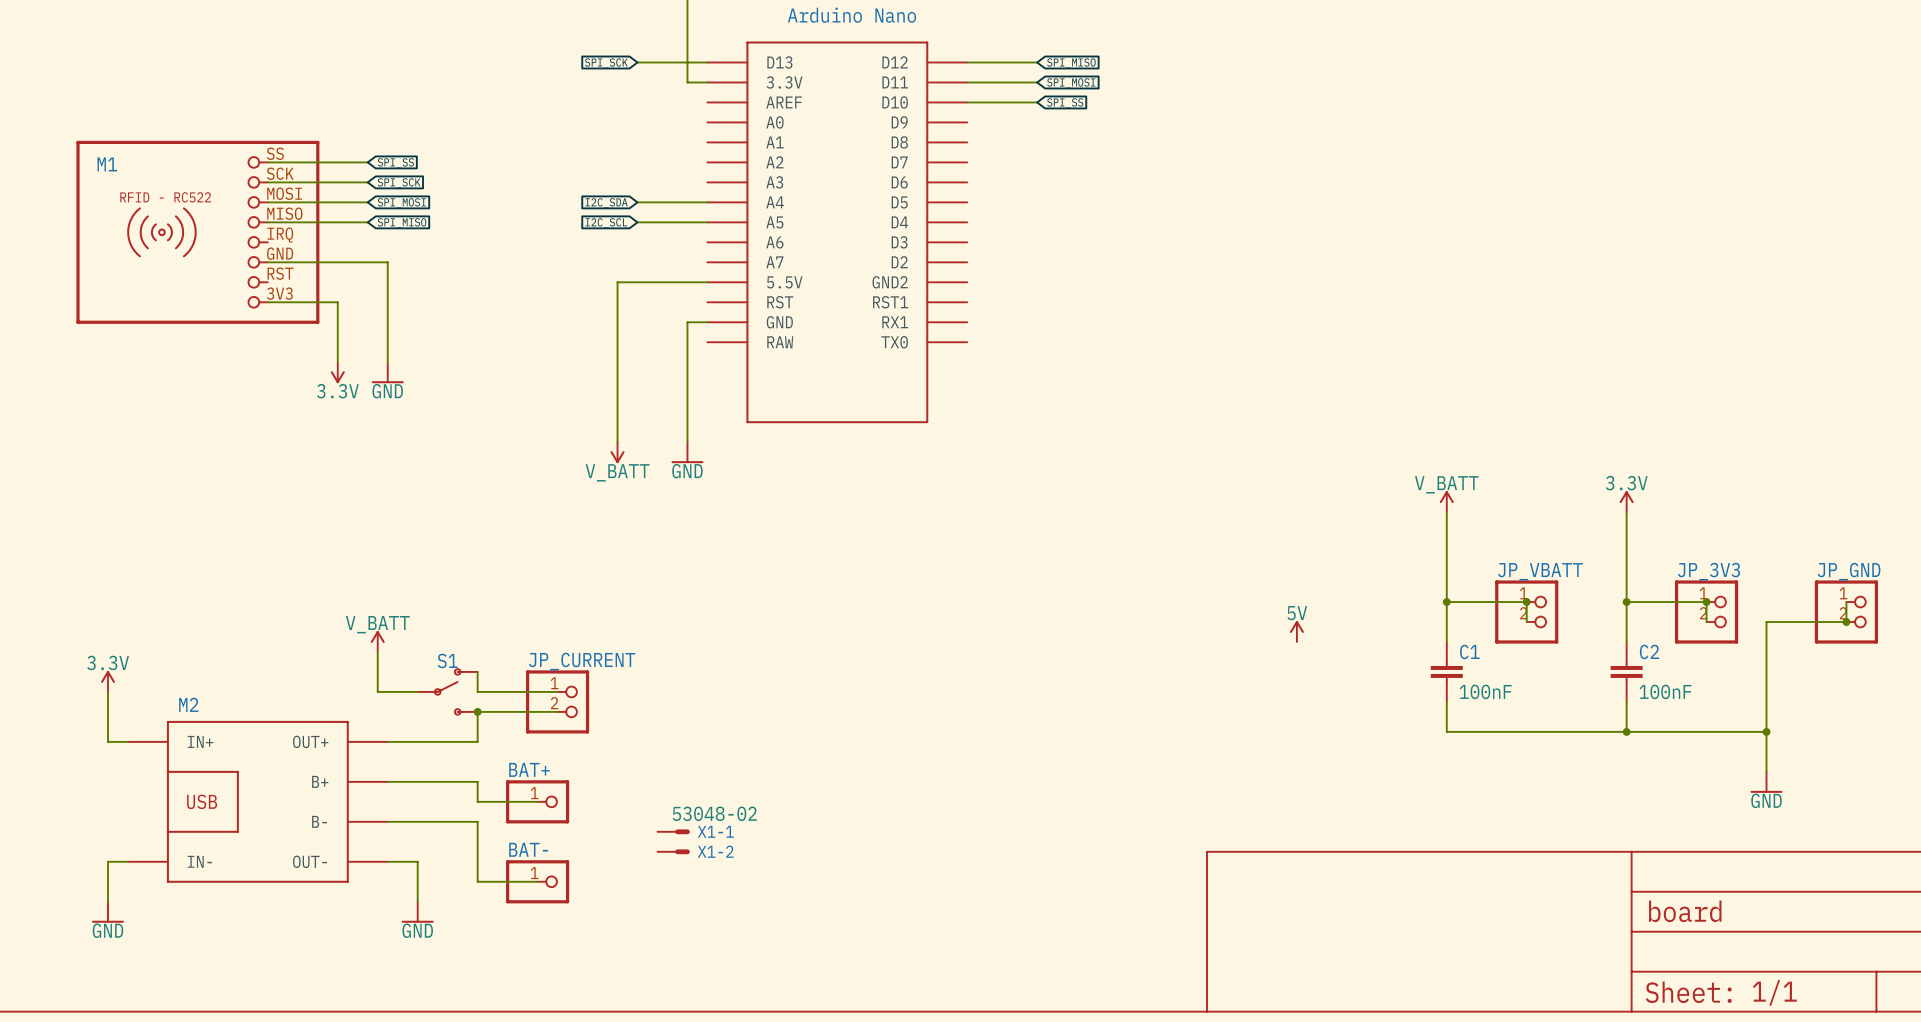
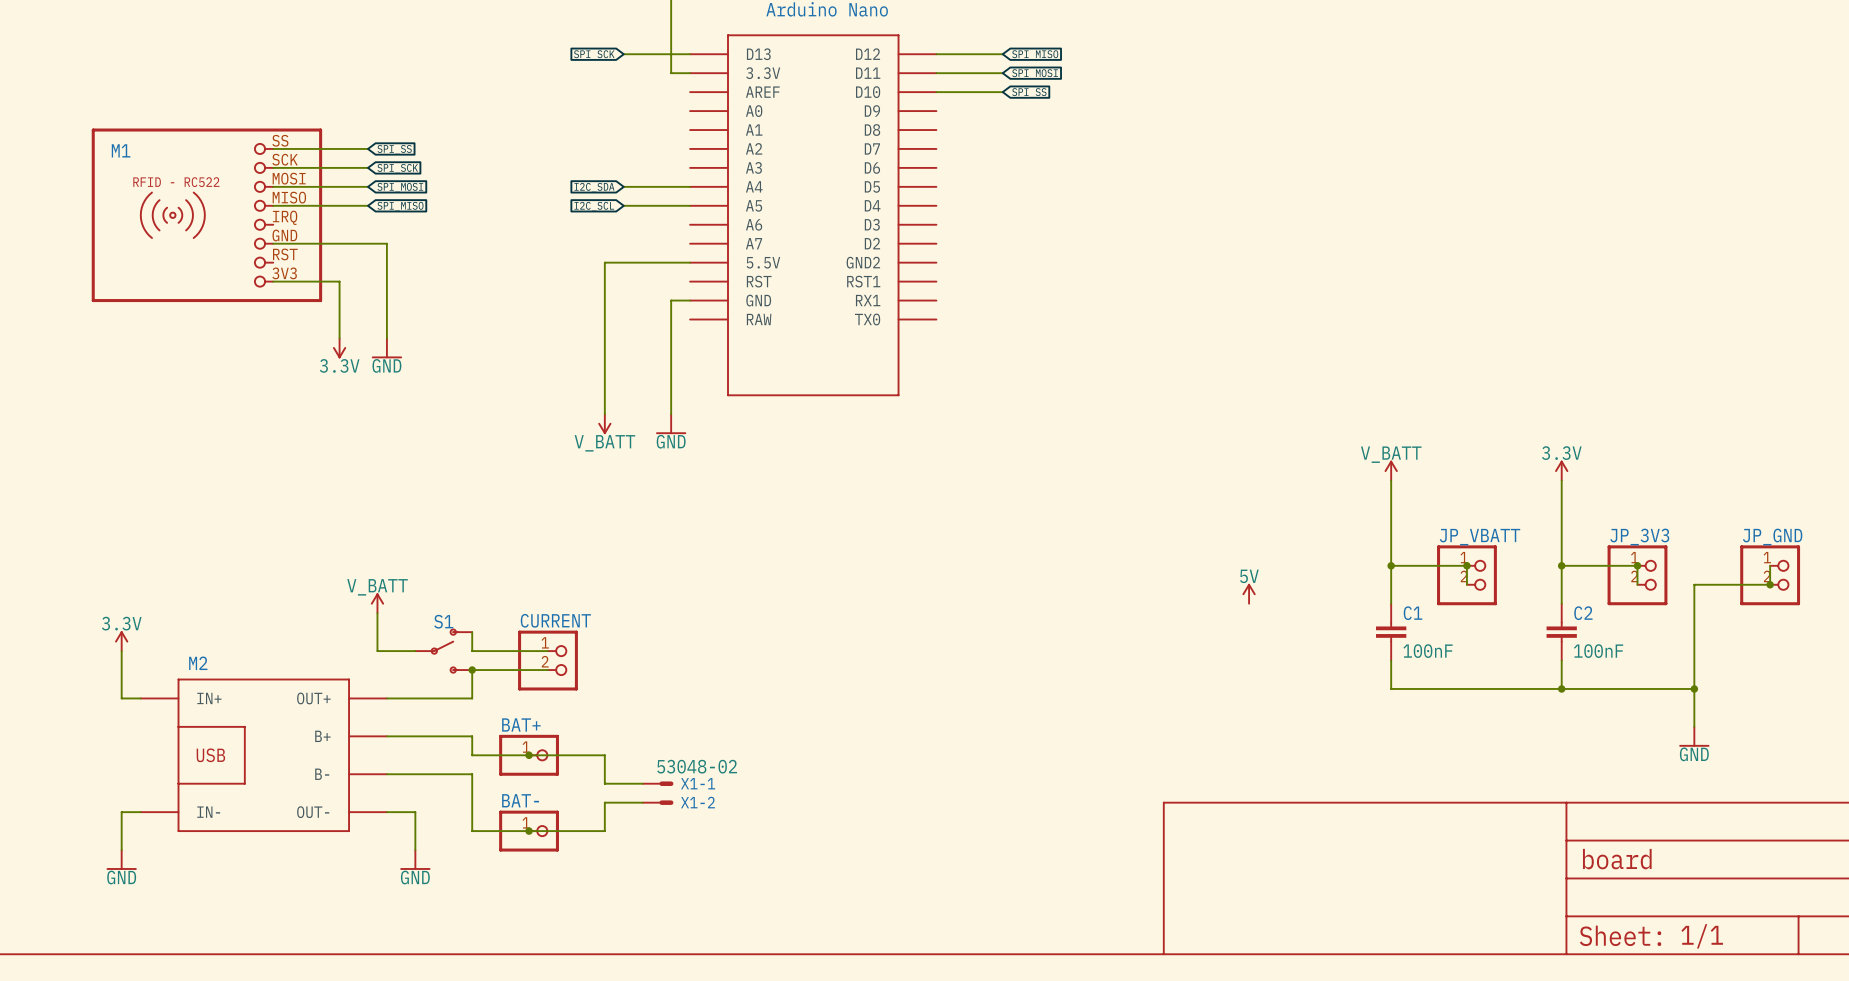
JP_CURRENT name: JP_CURRENT (582, 661) -> CURRENT (555, 620)
wire: none -> (529, 755) (604, 755) (604, 783) (642, 783)
junction: none -> (529, 755)
wire: none -> (642, 802) (604, 802) (604, 831) (529, 831)
junction: none -> (529, 831)

